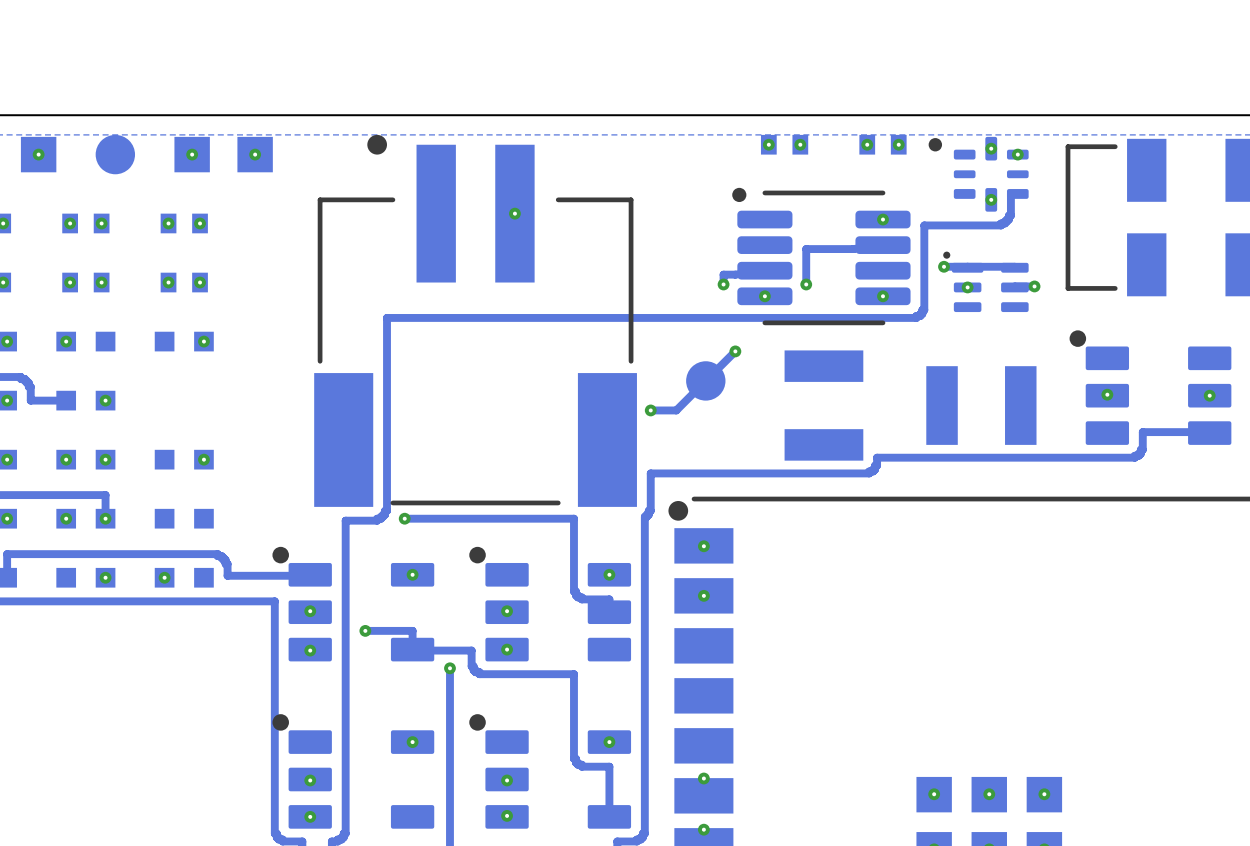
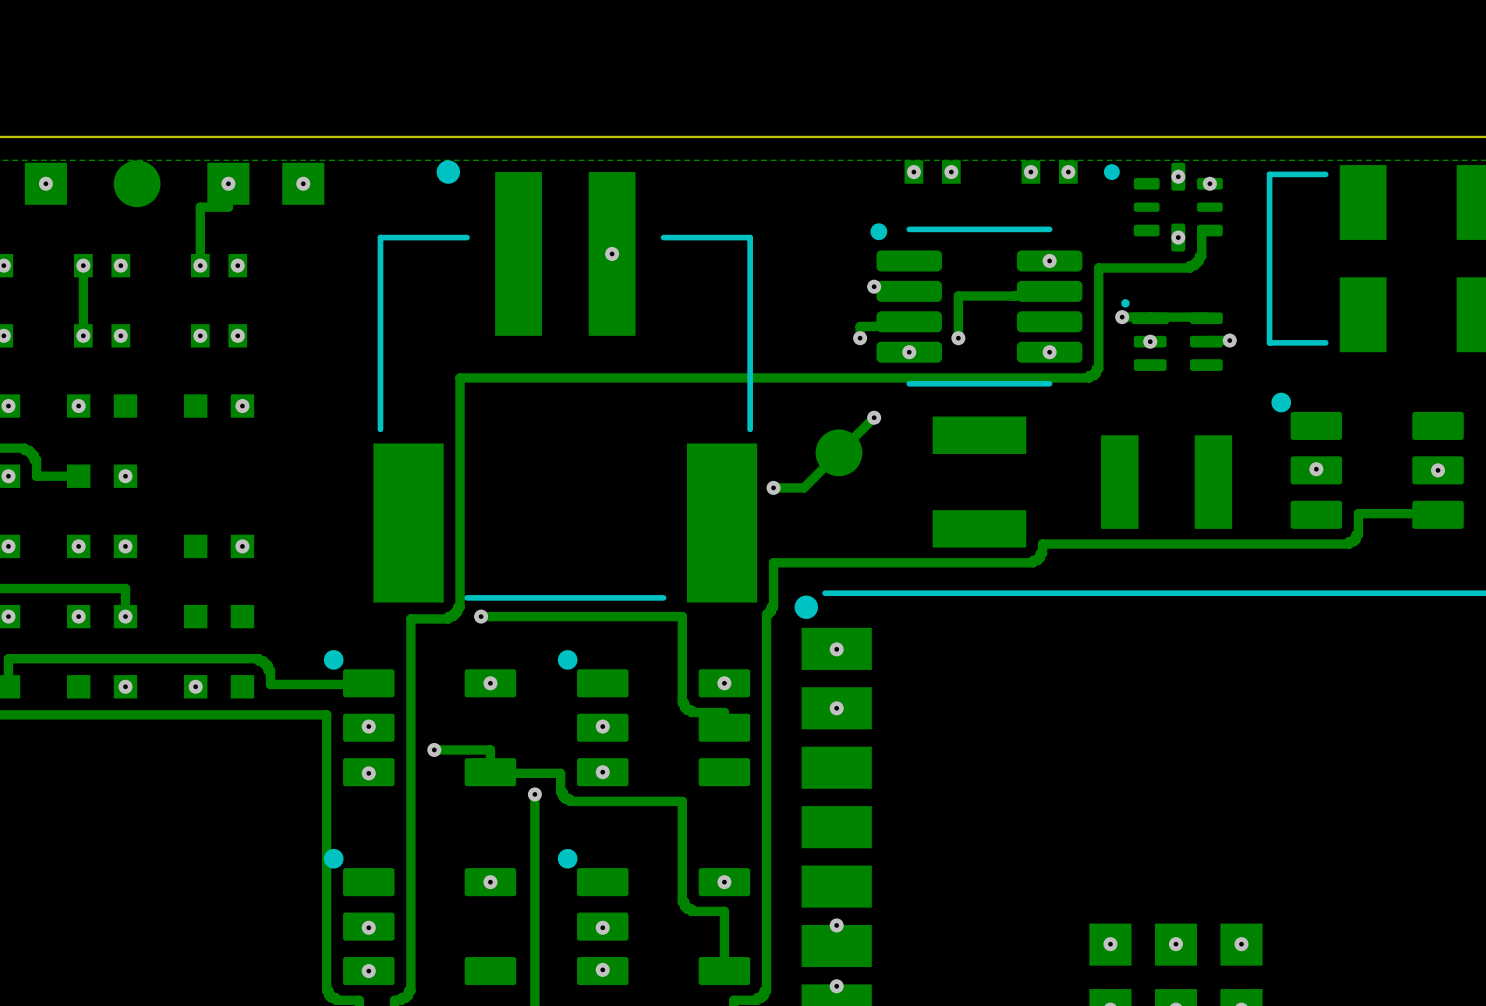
track: none -> (228, 183) (228, 207) (200, 207) (200, 265)
track: none -> (83, 265) (83, 335)
via: none -> (874, 286)

